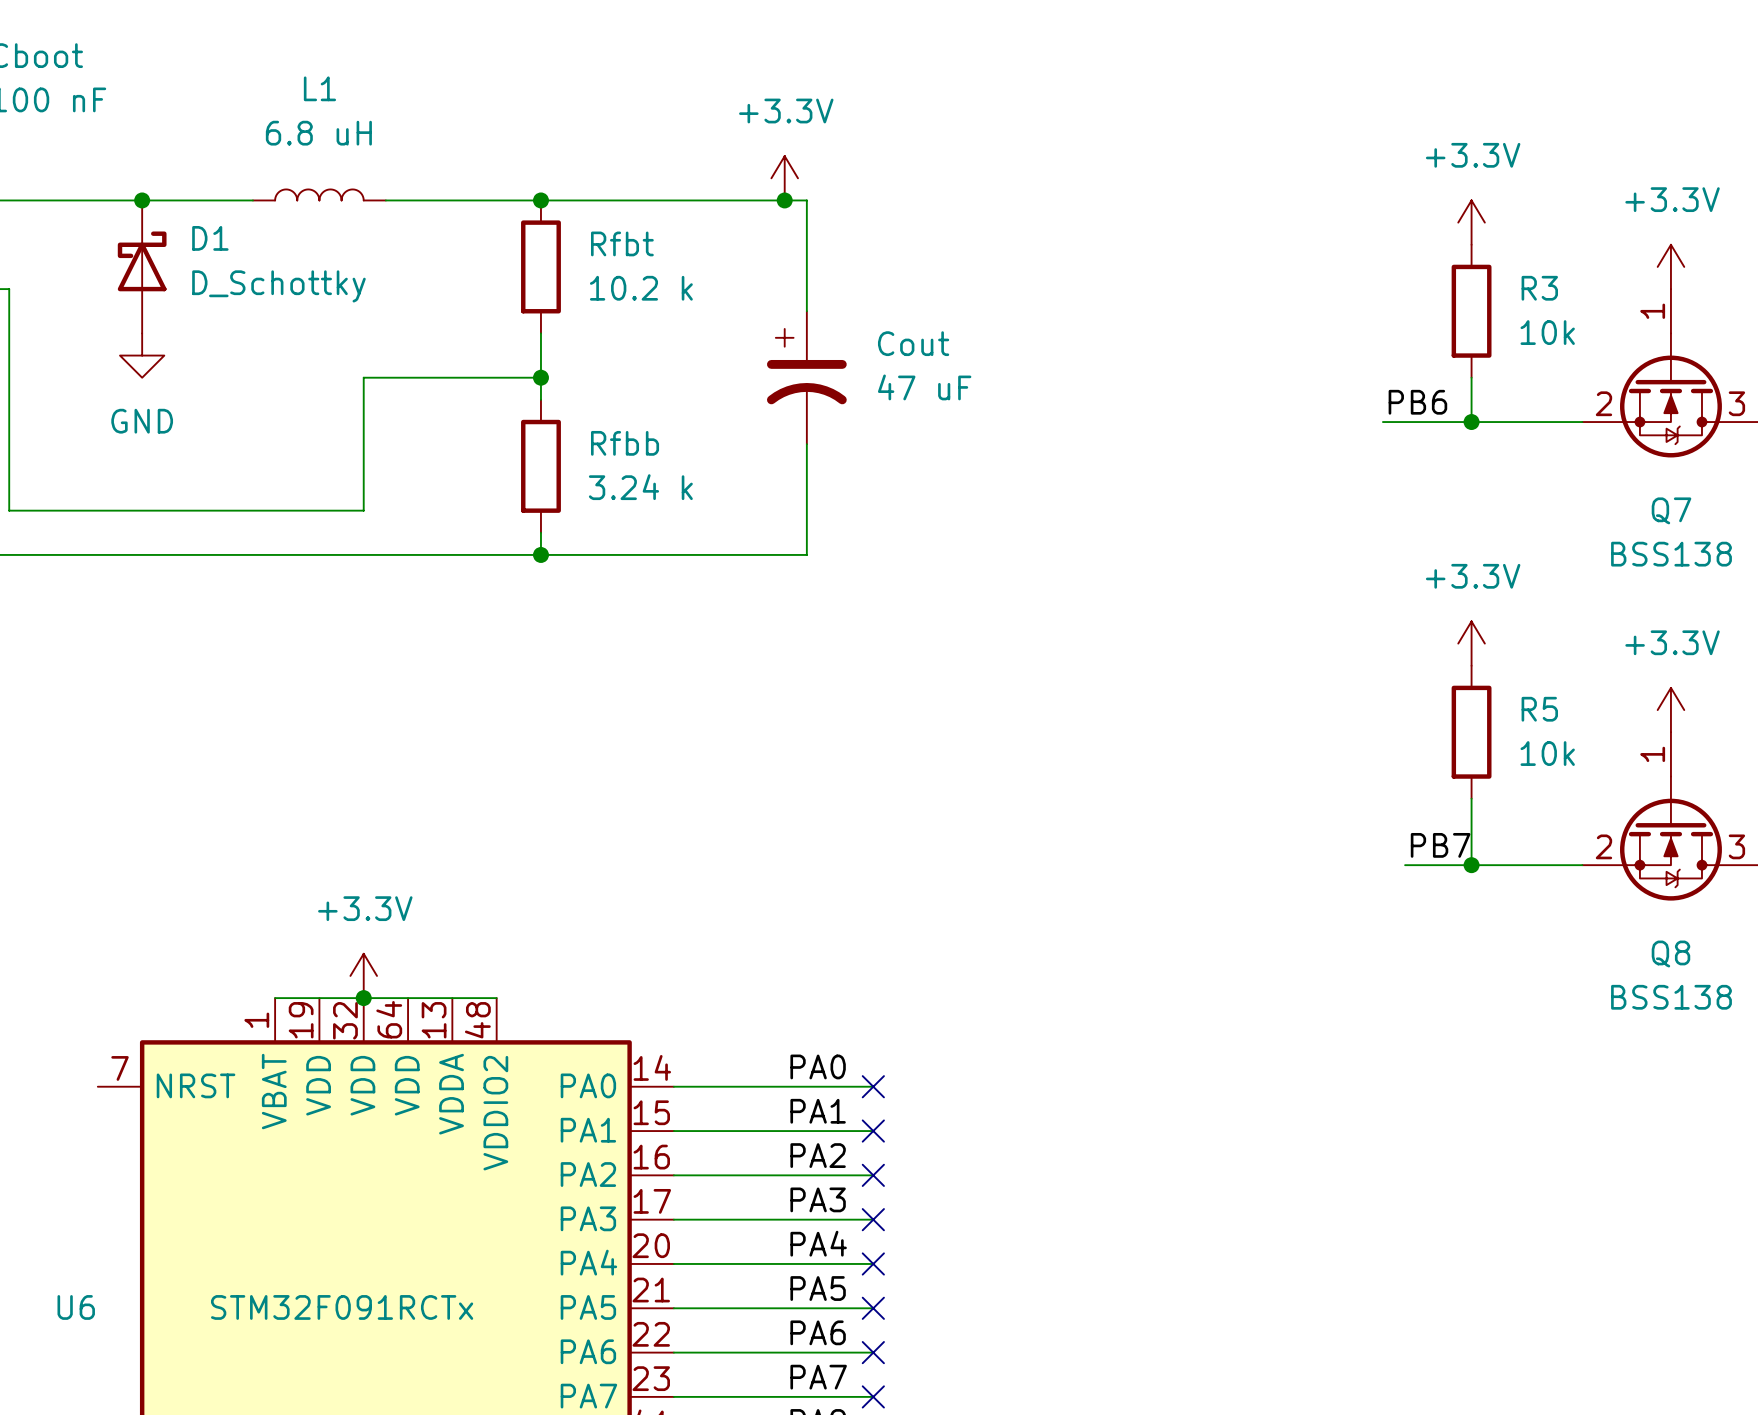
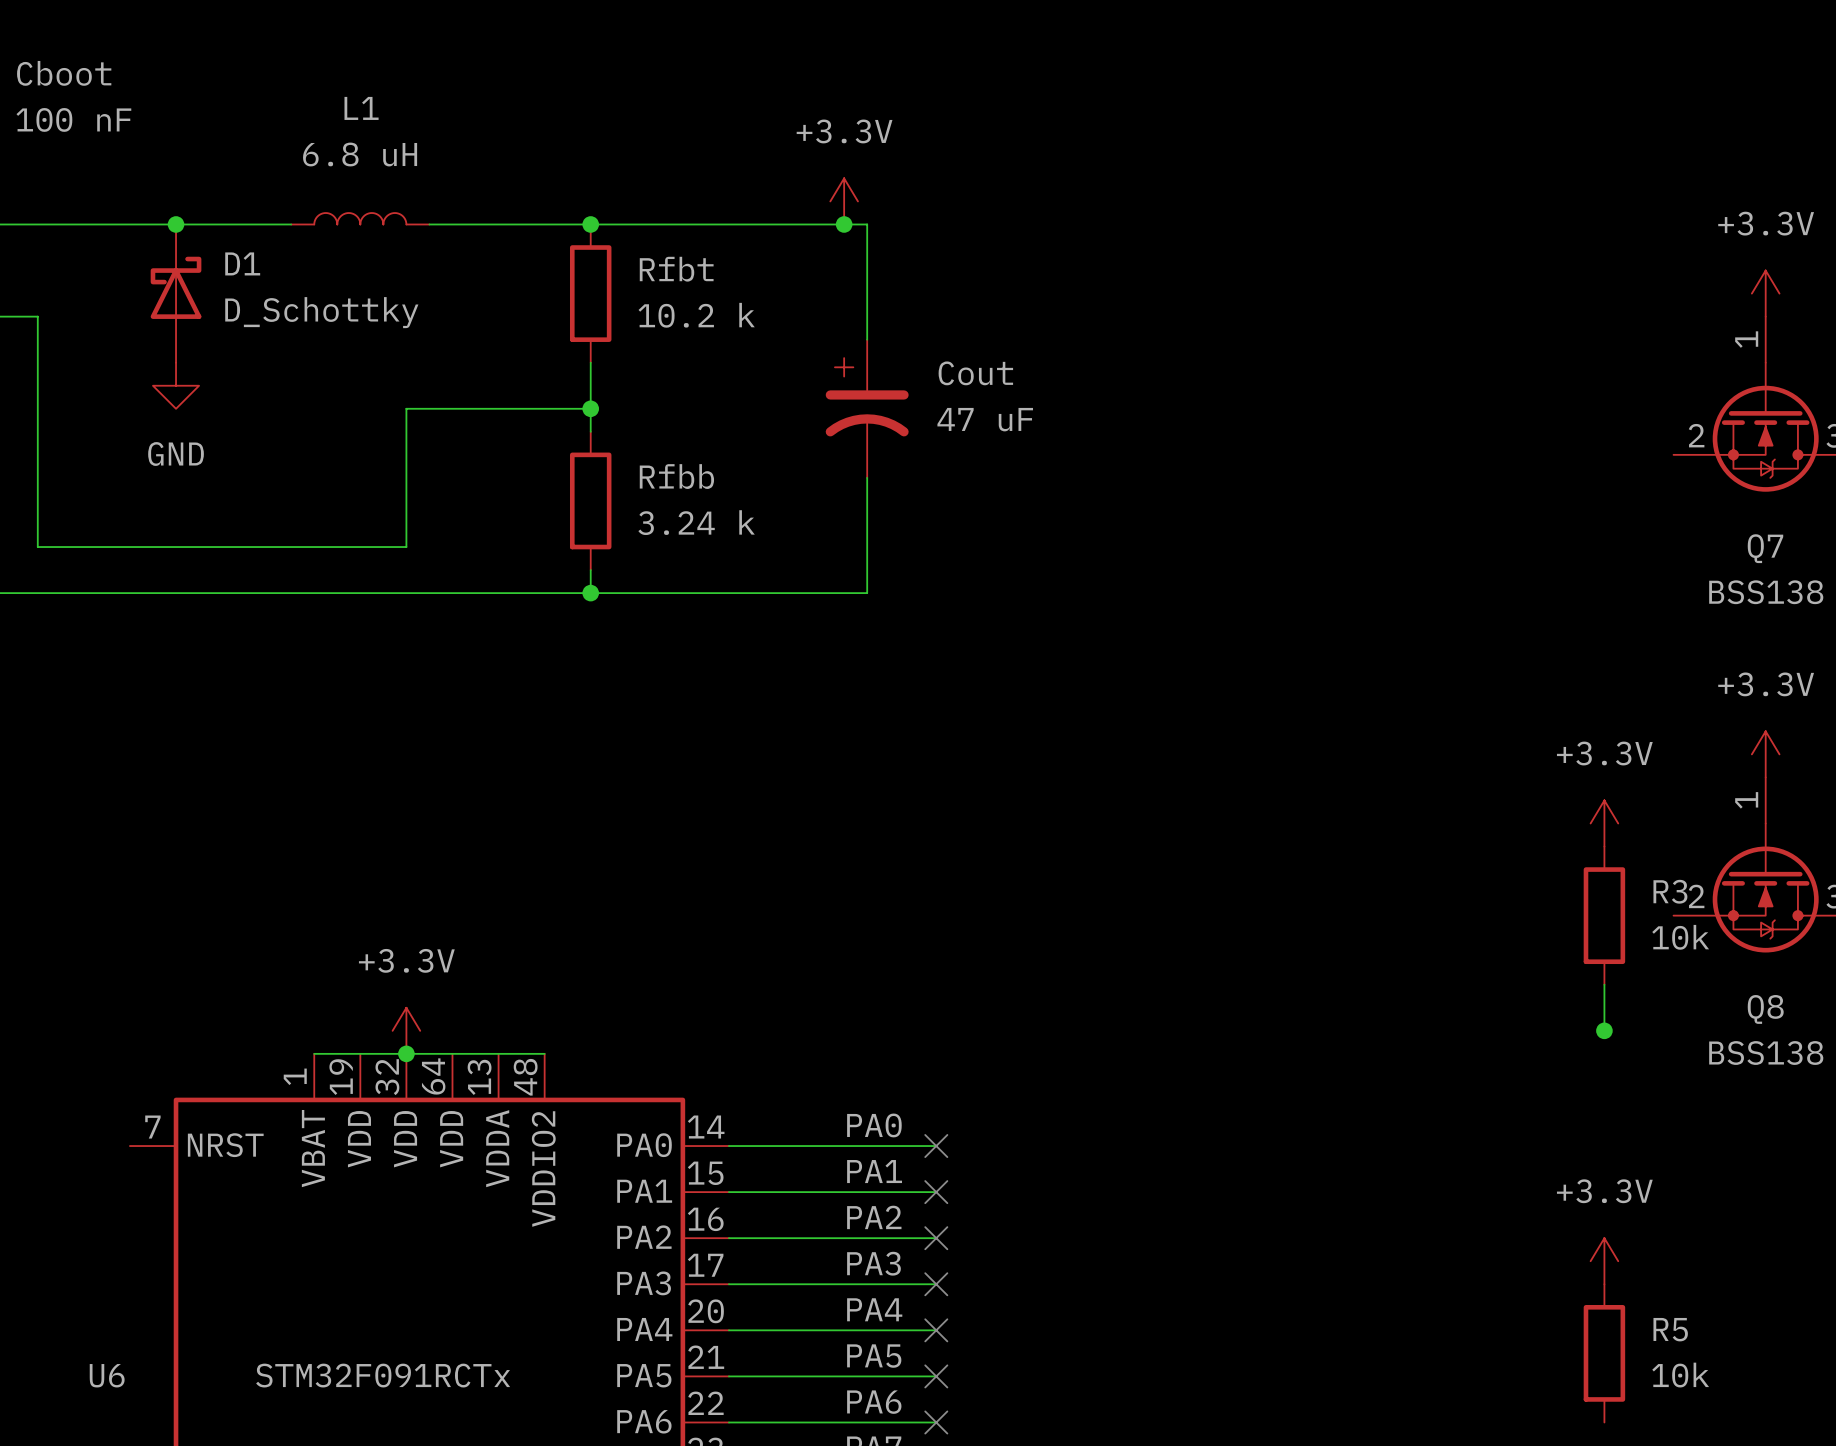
power symbol: +3.3V (1471, 222) -> none
R3 position: (1471, 311) -> (1604, 915)
wire: (1471, 377) (1471, 422) -> none
label: PB6 (1417, 402) -> none
wire: (1382, 422) (1582, 422) -> none
junction: (1471, 422) -> none
power symbol position: +3.3V (1471, 643) -> +3.3V (1604, 823)
R5 position: (1471, 732) -> (1604, 1353)
wire: (1471, 798) (1471, 865) -> none
label: PB7 (1440, 845) -> none
wire: (1405, 865) (1582, 865) -> none
junction: (1471, 865) -> none
wire: none -> (1604, 984) (1604, 1030)
junction: none -> (1604, 1030)
power symbol: none -> +3.3V (1604, 1261)

